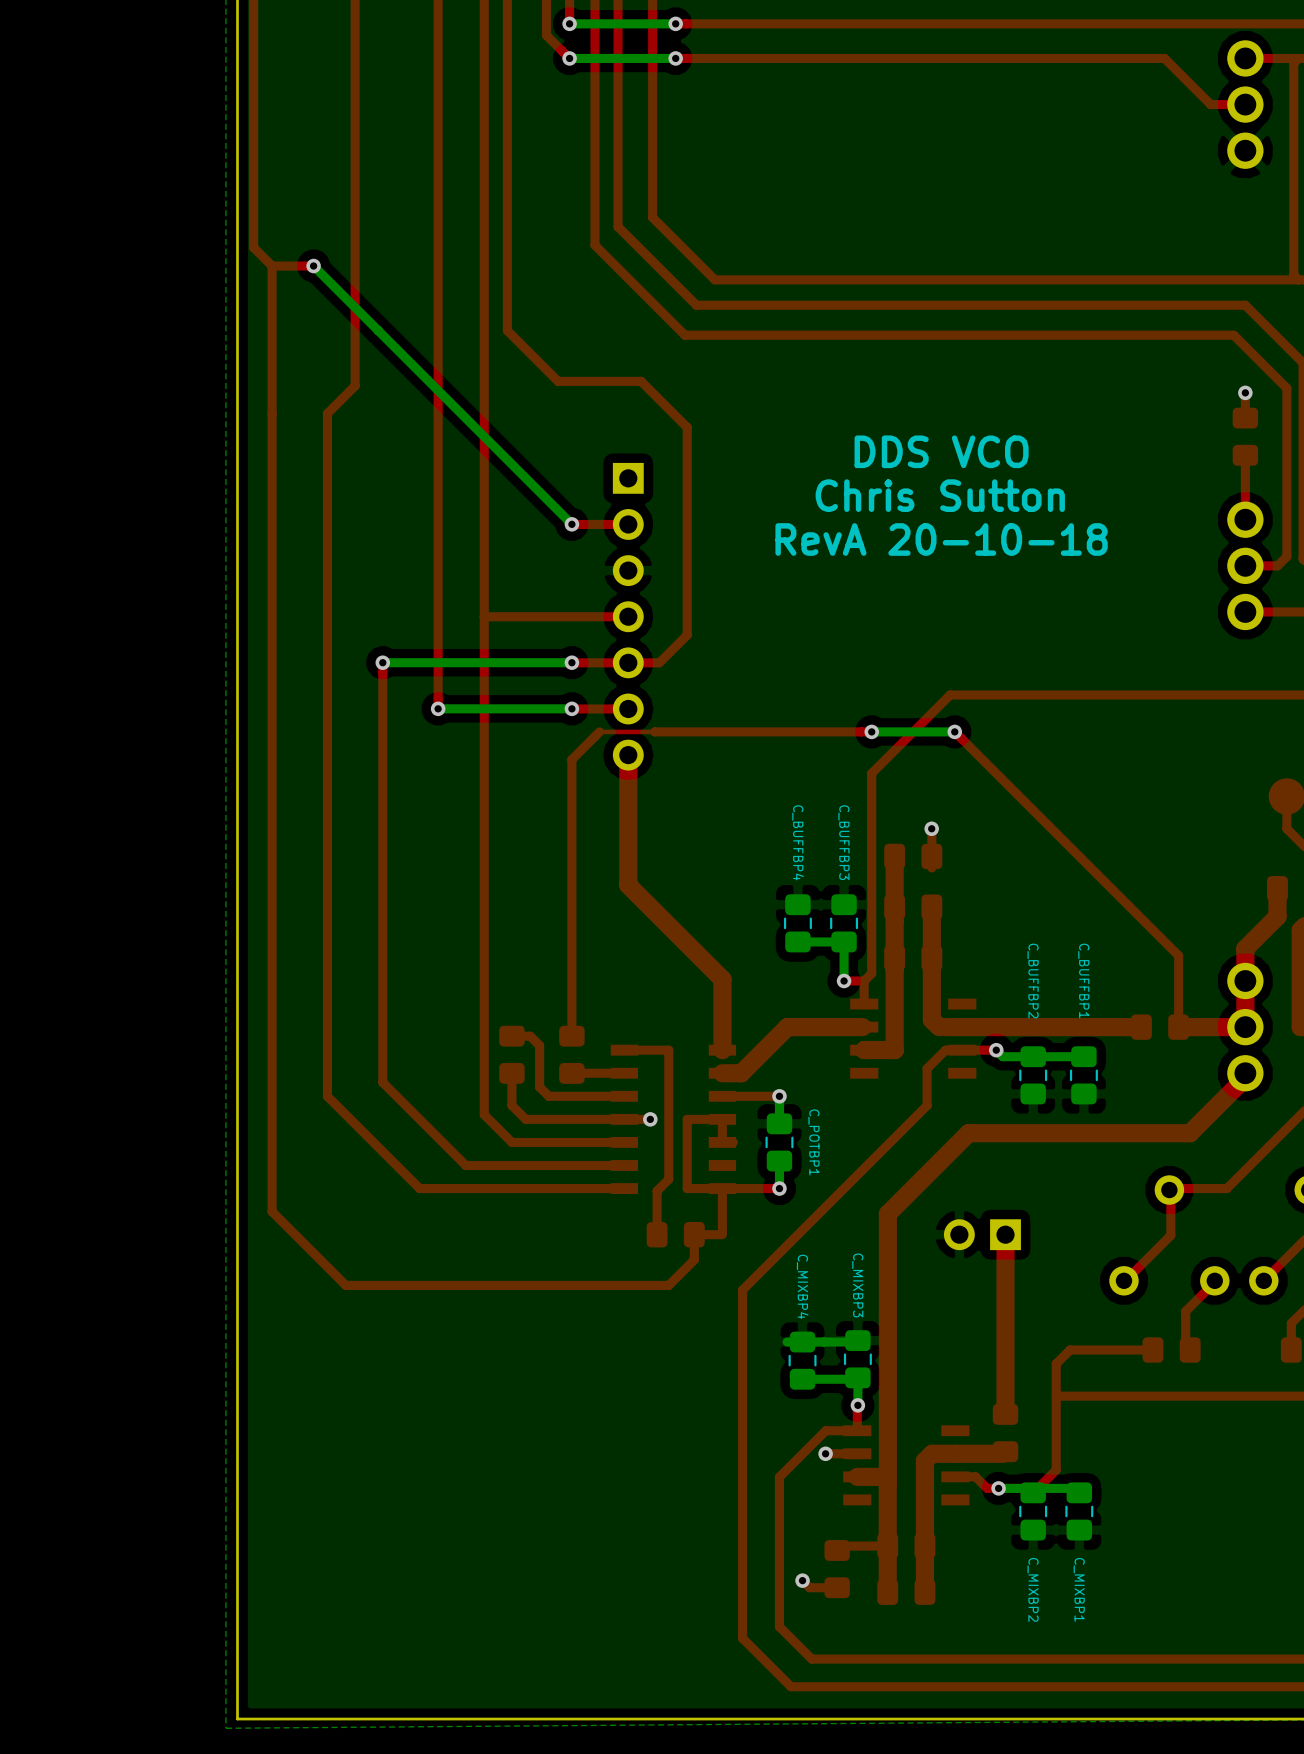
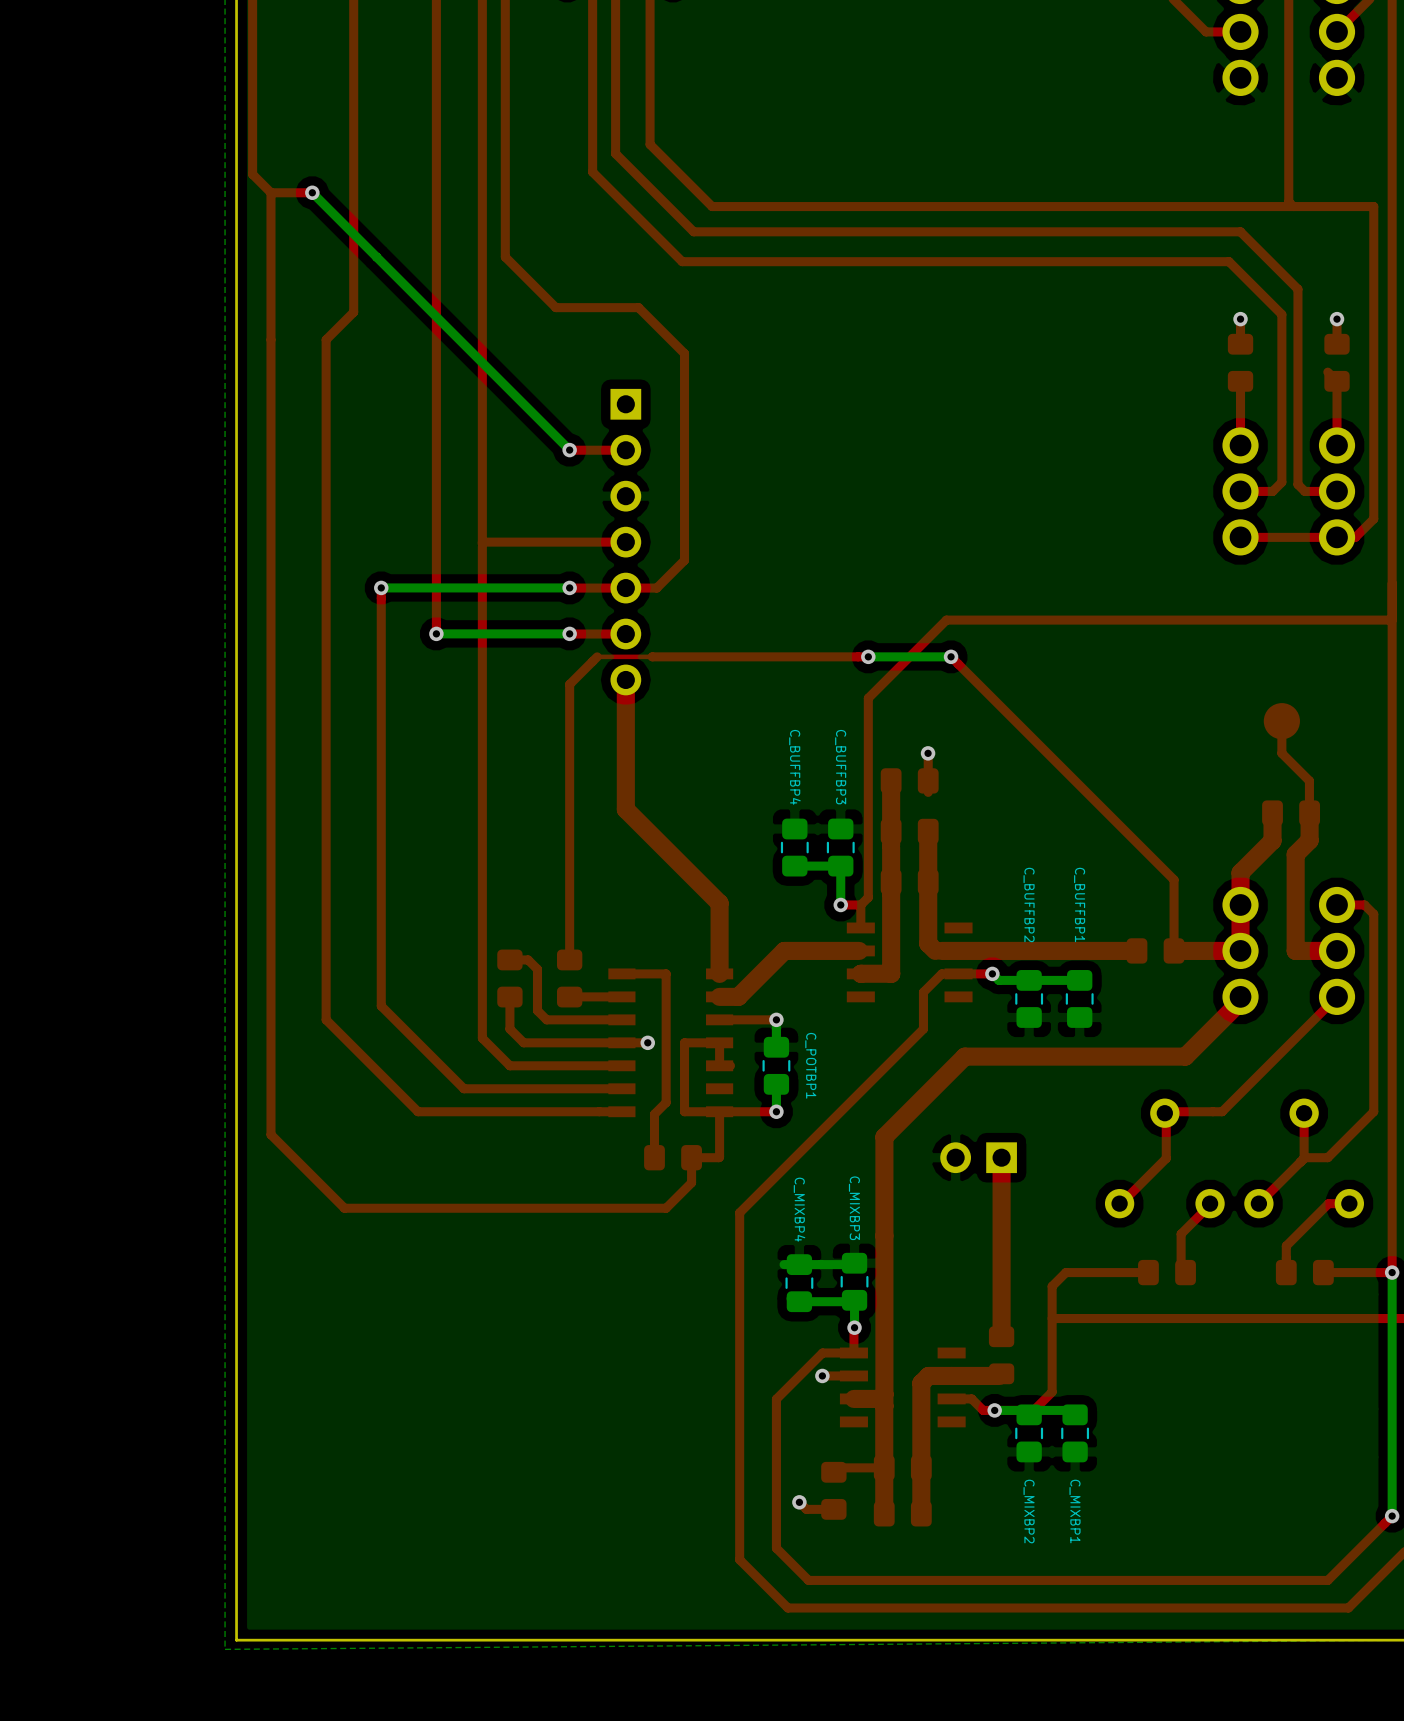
text: DDS VCO (941, 451) -> none
text: Chris Sutton (940, 495) -> none
text: RevA 20-10-18 (941, 539) -> none

